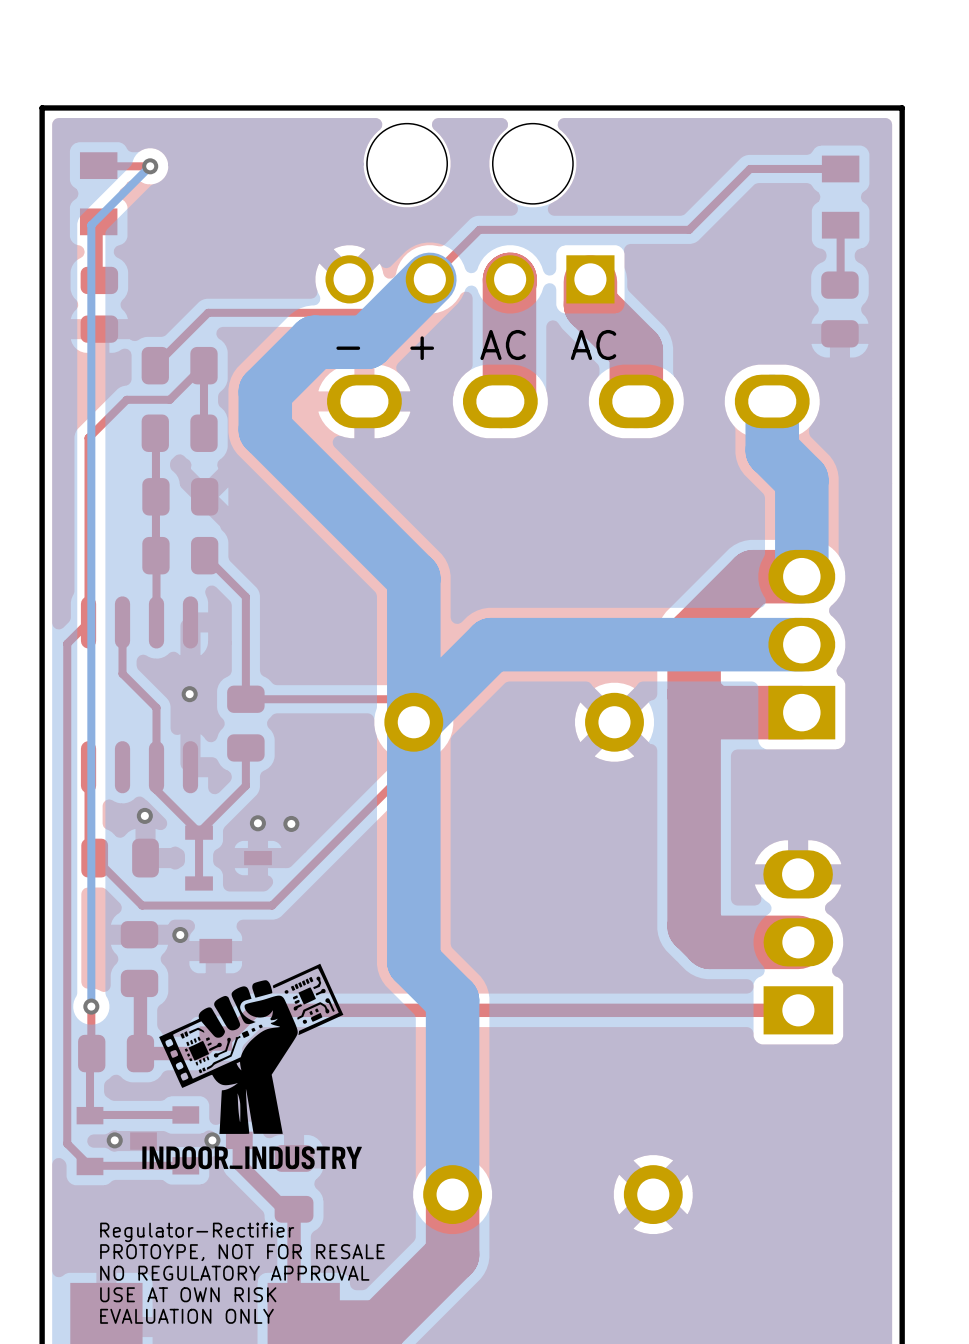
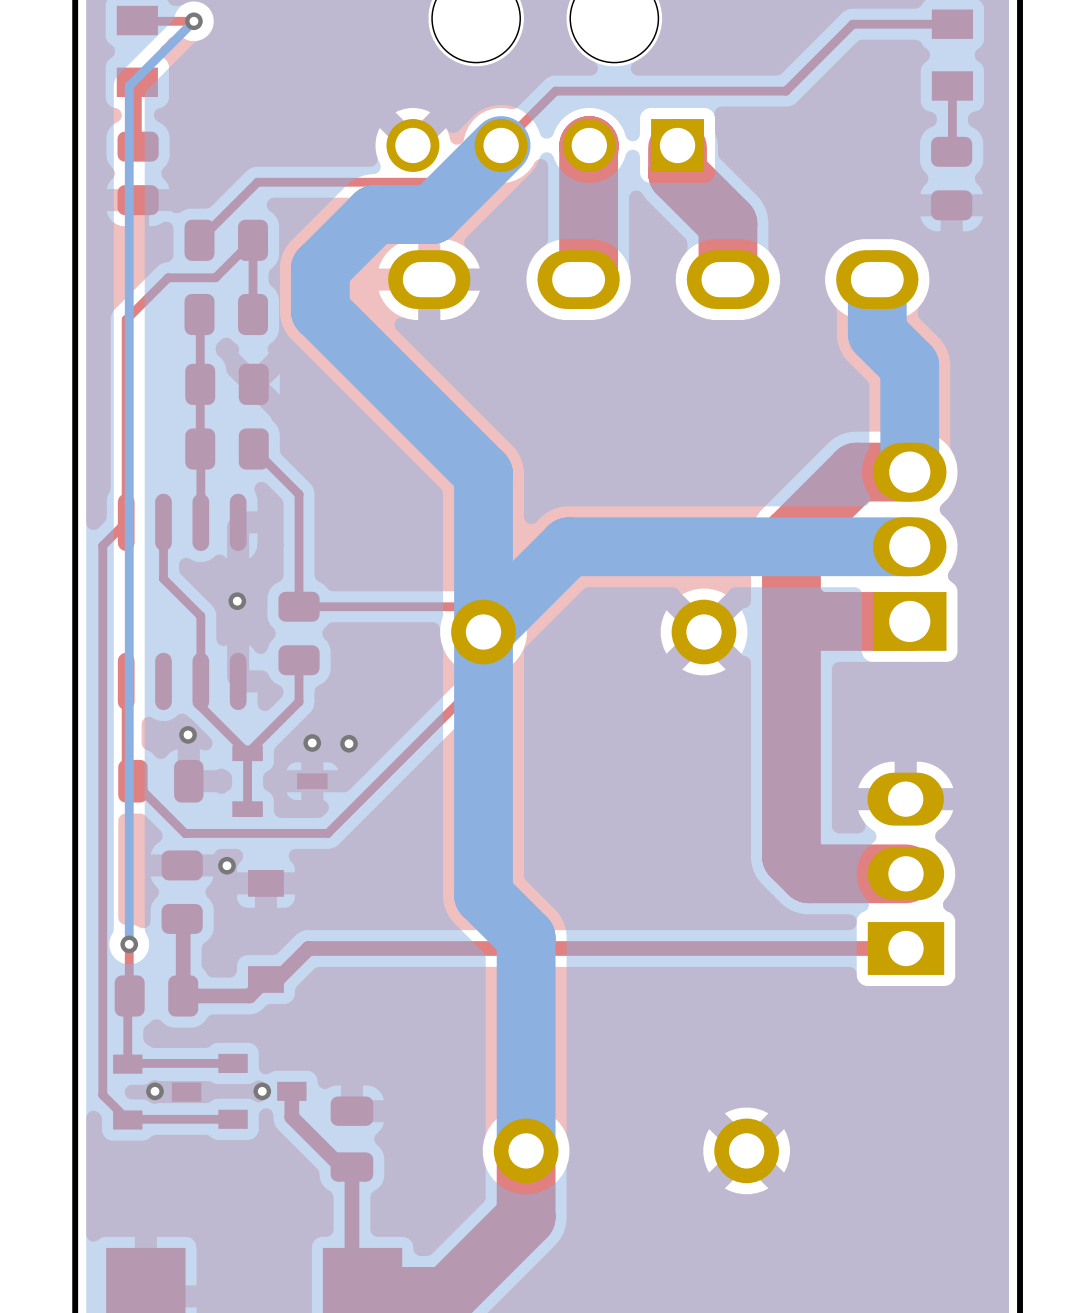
text: - + AC AC (476, 345) -> none
drawing: [142, 963, 362, 1170] -> none
text: Regulator-Rectifier (197, 1232) -> none
text: PROTOYPE, NOT FOR RESALE (242, 1252) -> none
text: NO REGULATORY APPROVAL (234, 1273) -> none
text: USE AT OWN RISK (188, 1294) -> none
text: EVALUATION ONLY (186, 1316) -> none

